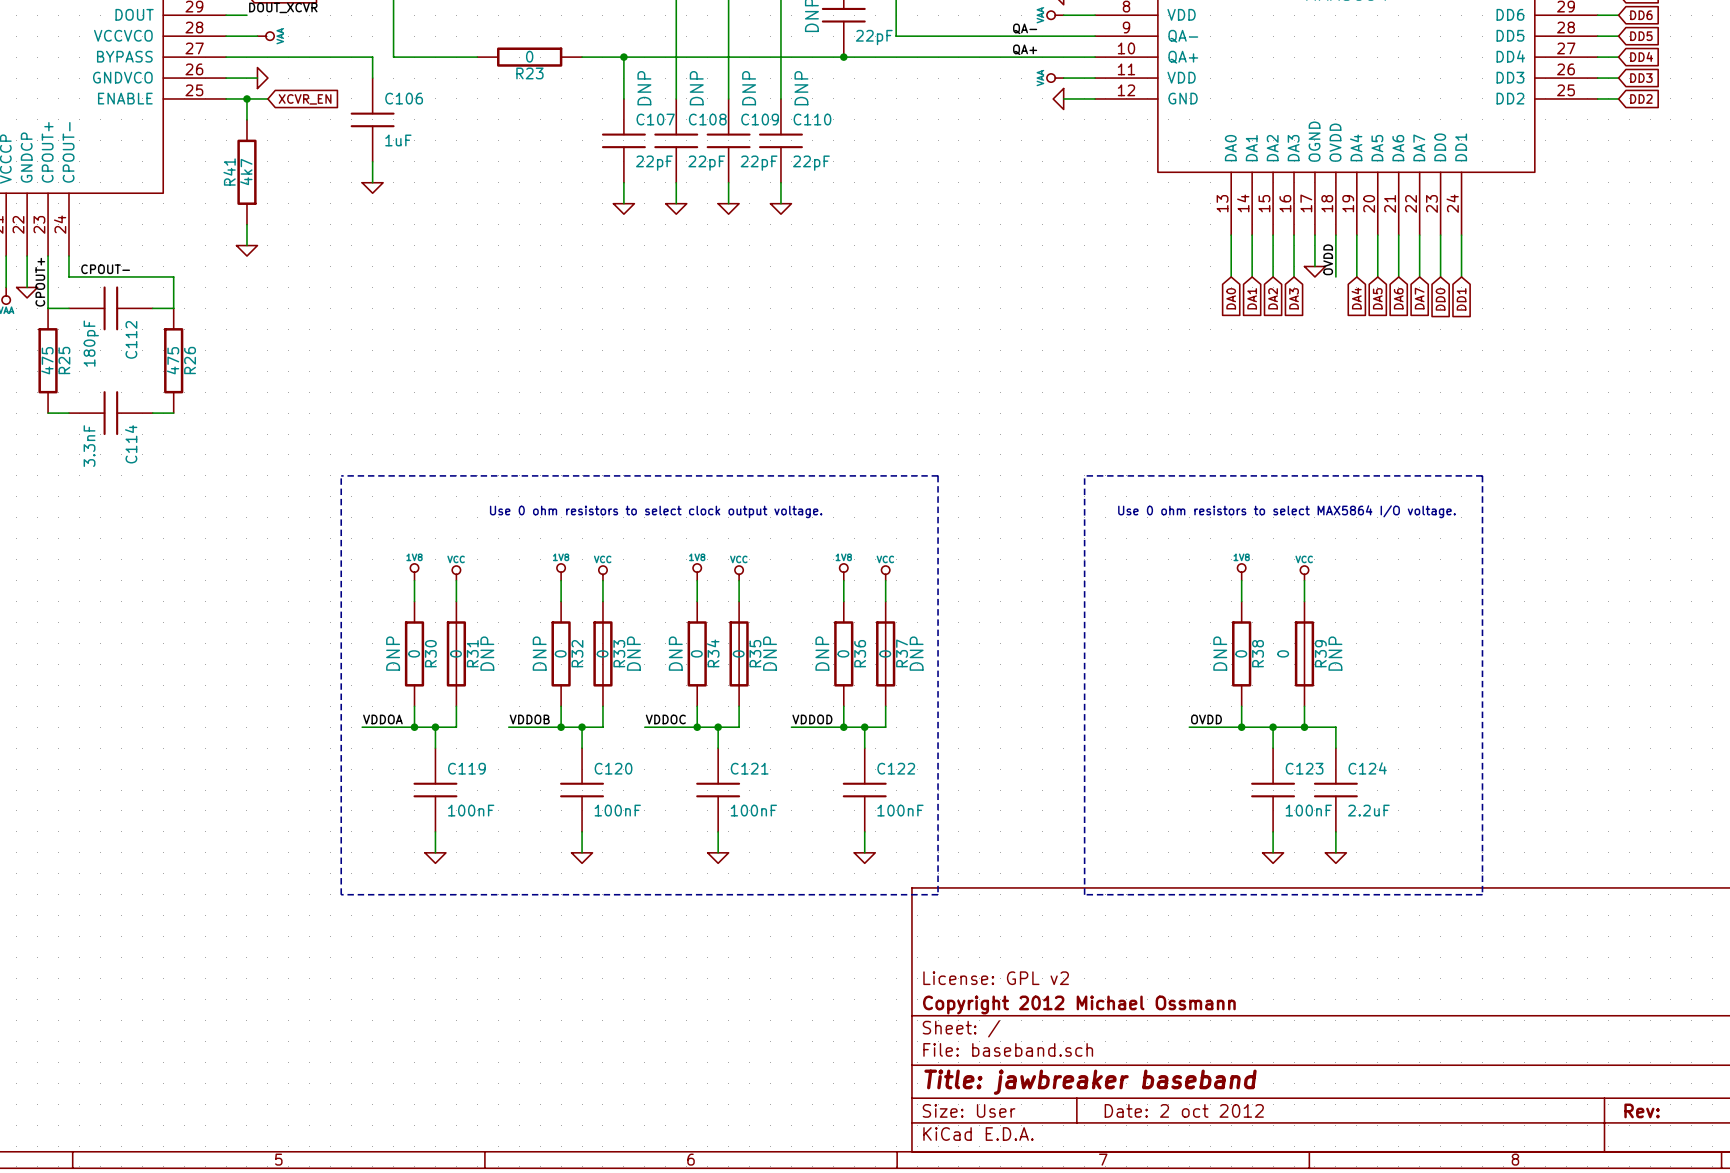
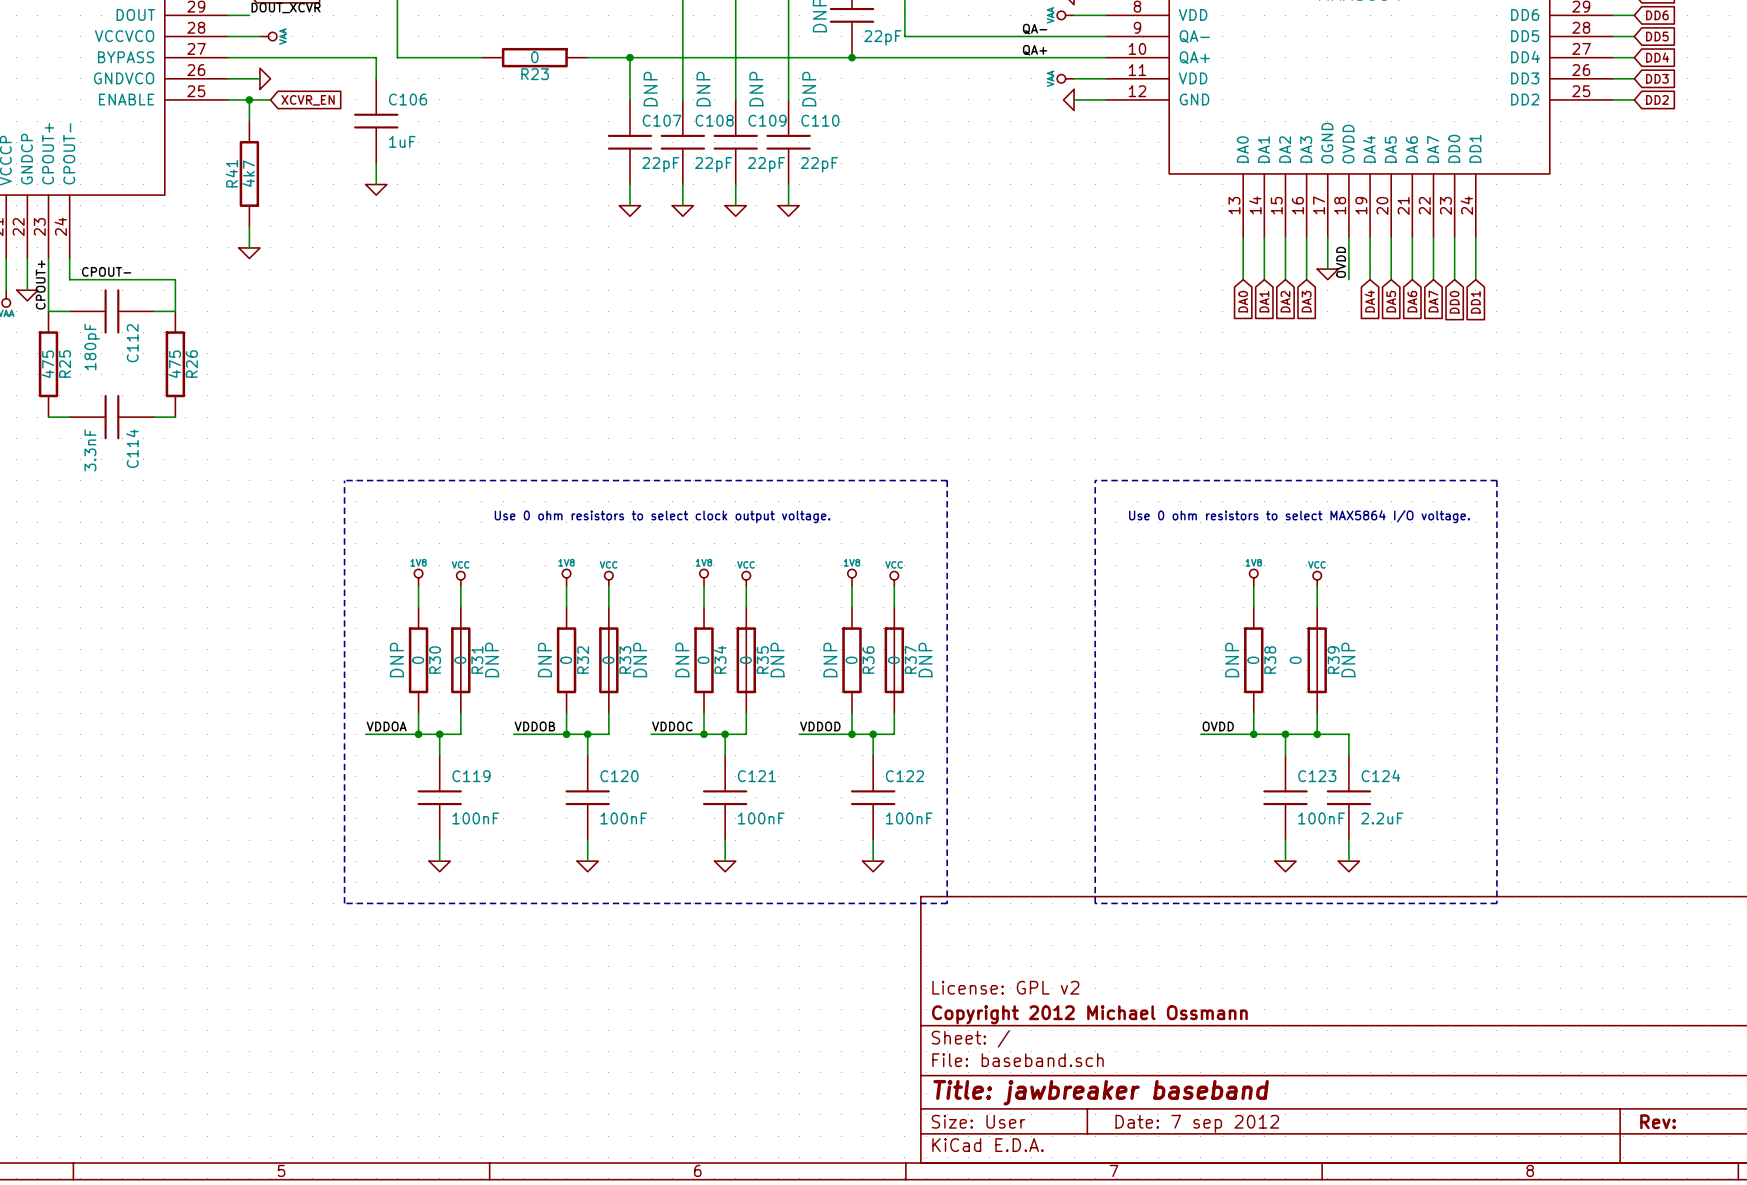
title block: Date: 2 oct 2012 (1184, 1110) -> Date: 7 sep 2012 (1197, 1123)

